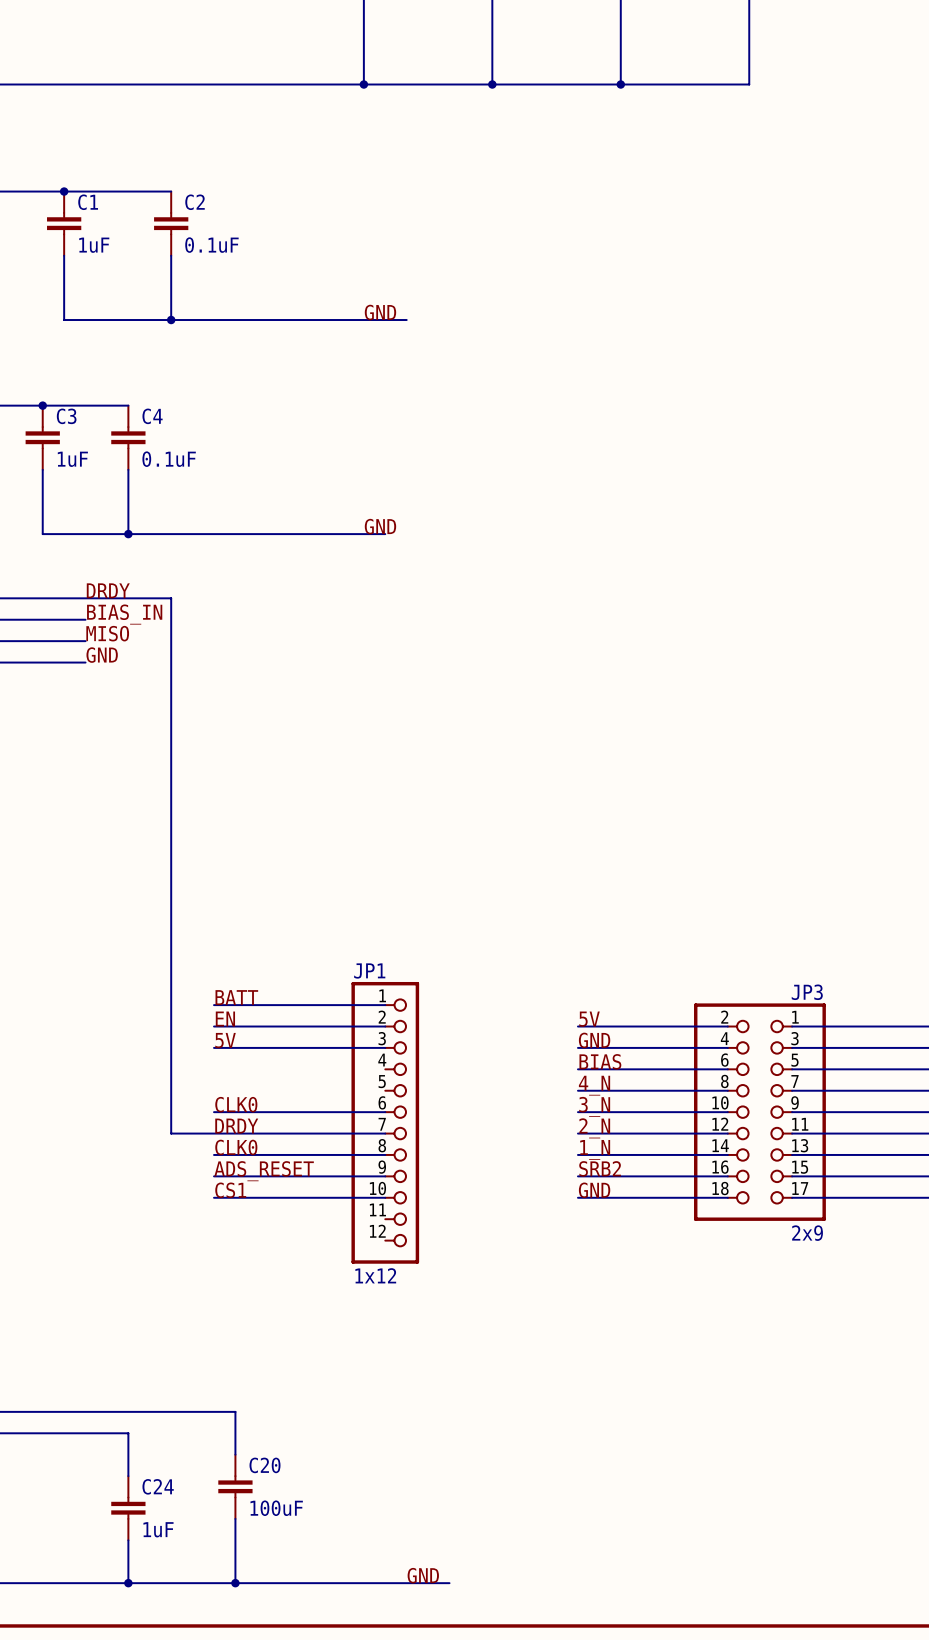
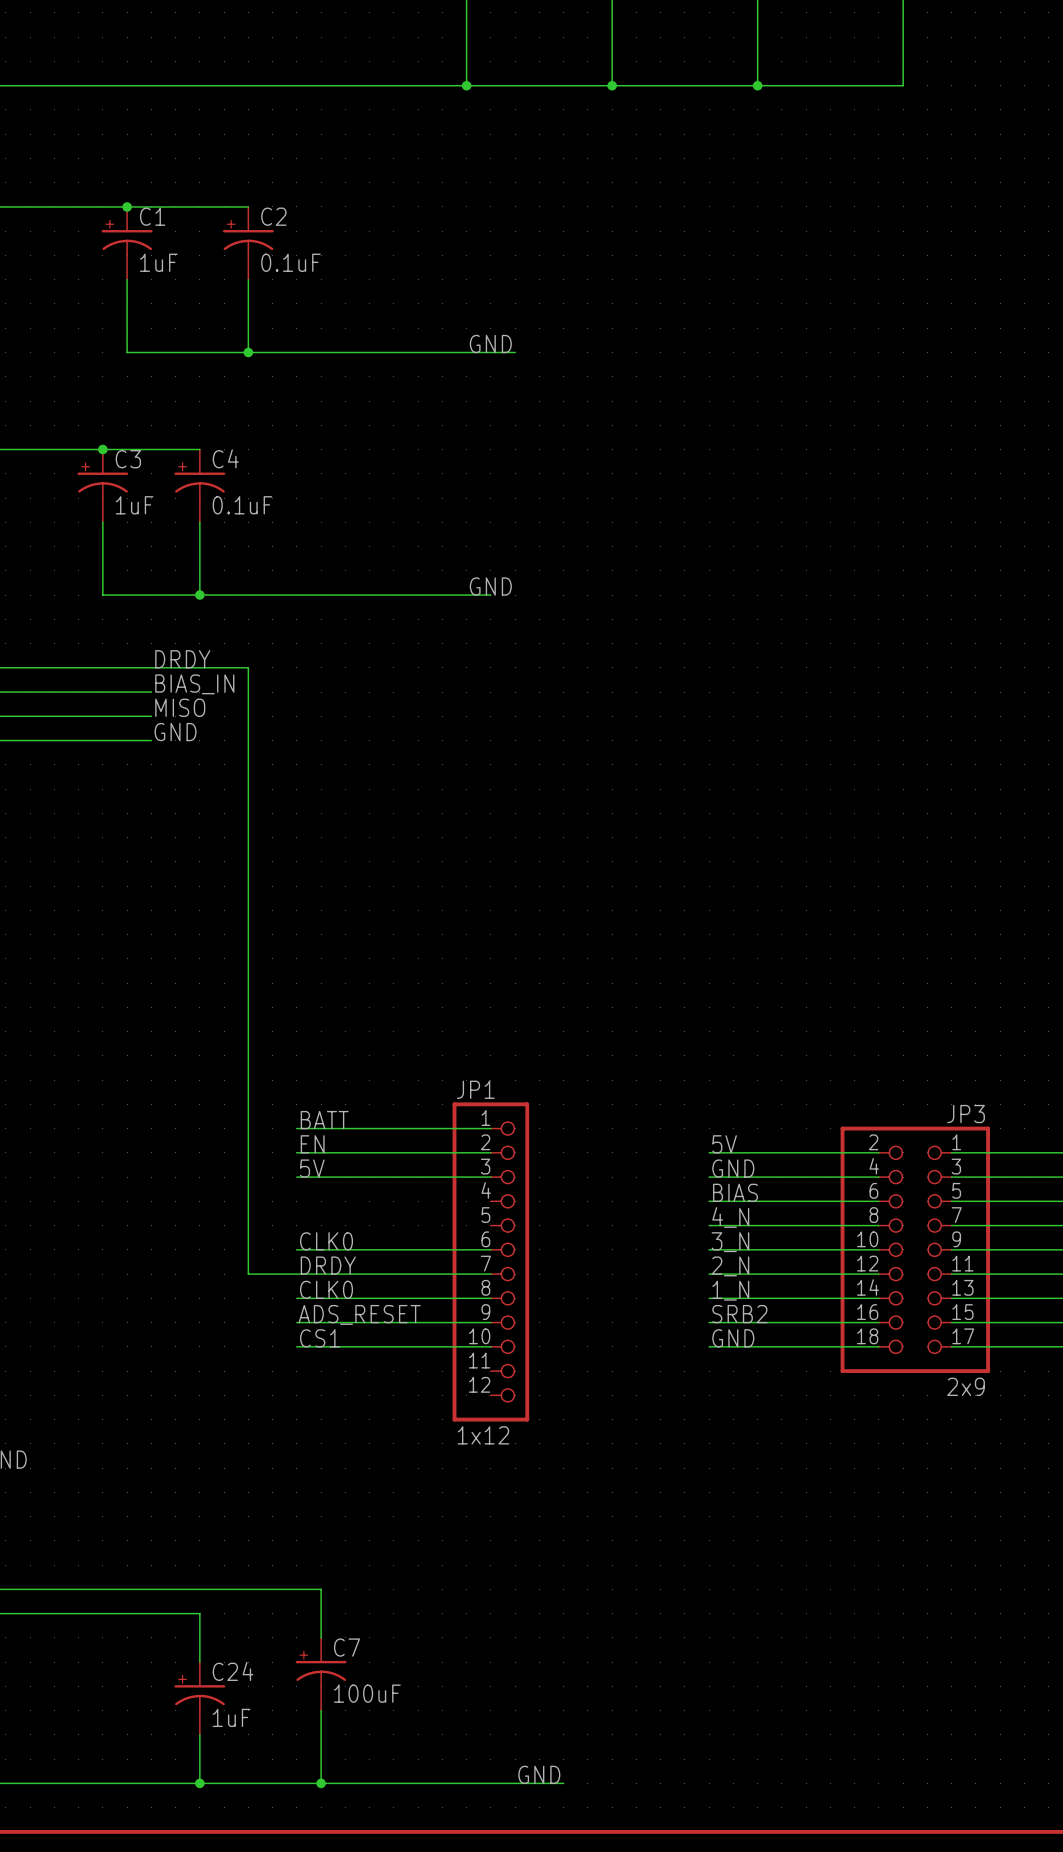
C1 symbol: [47, 191, 82, 256] -> [101, 206, 153, 280]
C2 symbol: [154, 191, 189, 256] -> [222, 206, 274, 280]
C3 symbol: [25, 405, 60, 470] -> [77, 449, 129, 523]
C4 symbol: [111, 405, 146, 470] -> [174, 449, 226, 523]
C24 symbol: [111, 1476, 146, 1541] -> [174, 1662, 226, 1735]
C20: 100uF (235, 1486) -> none
C7: none -> 100uF (321, 1674)

